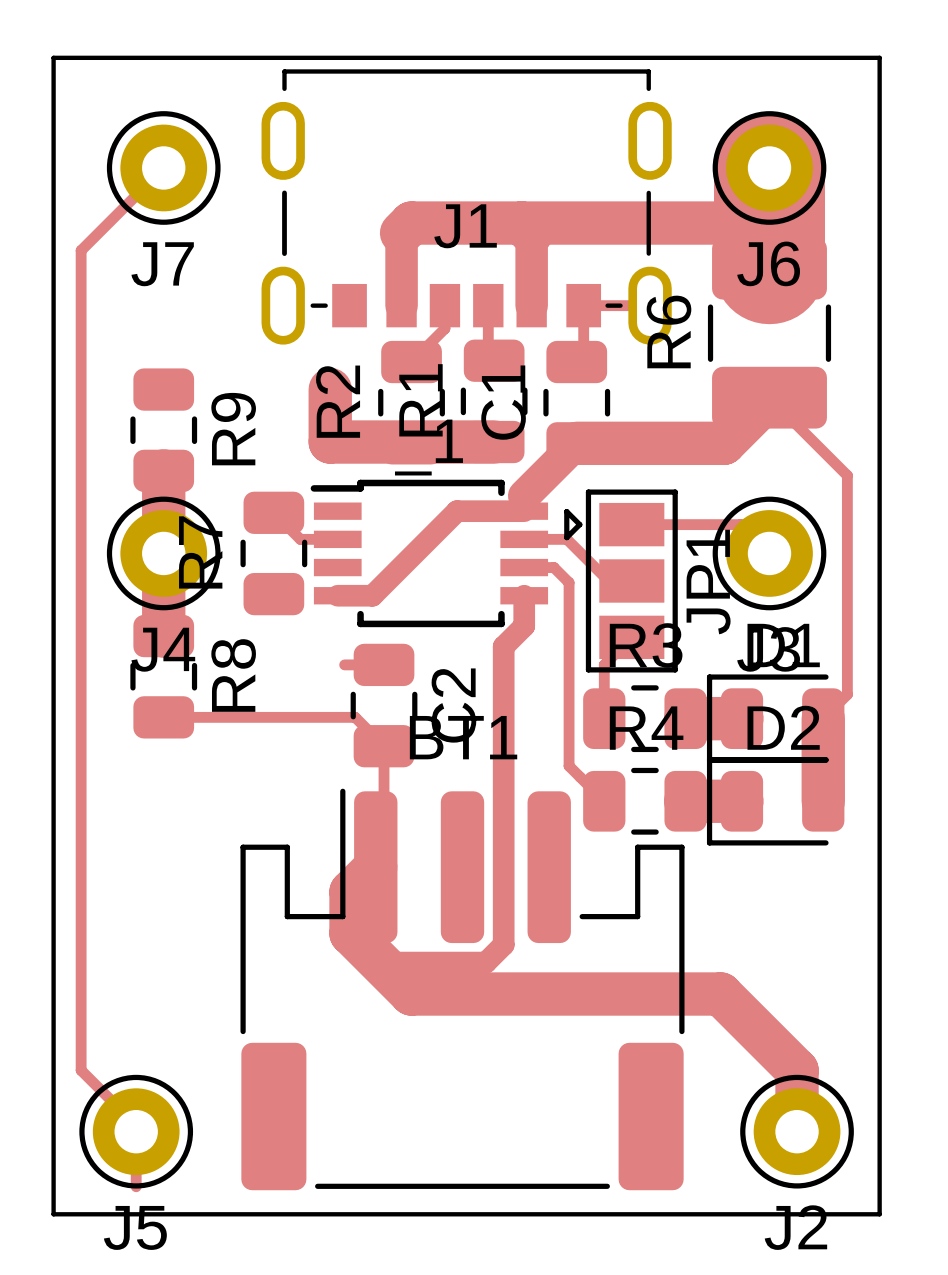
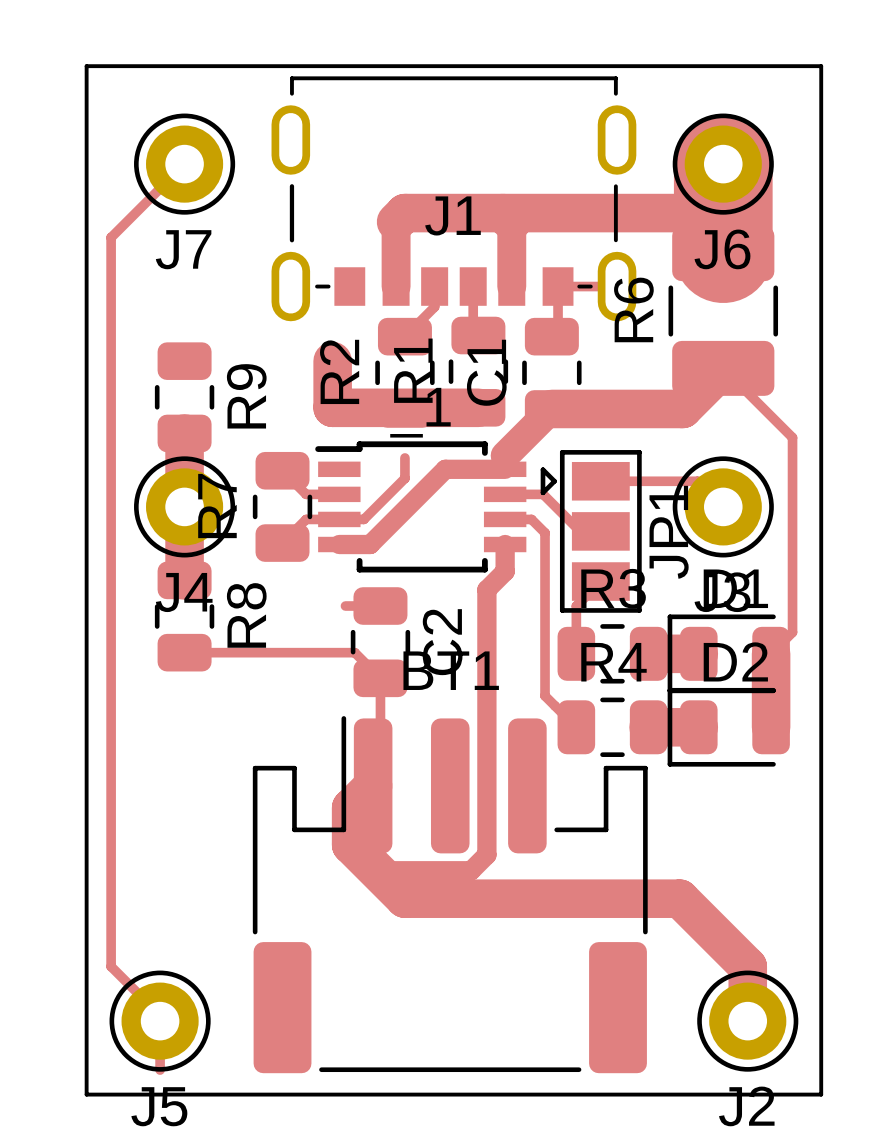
top track: none -> (404, 457) (404, 478) (363, 519) (306, 519) (282, 543)

